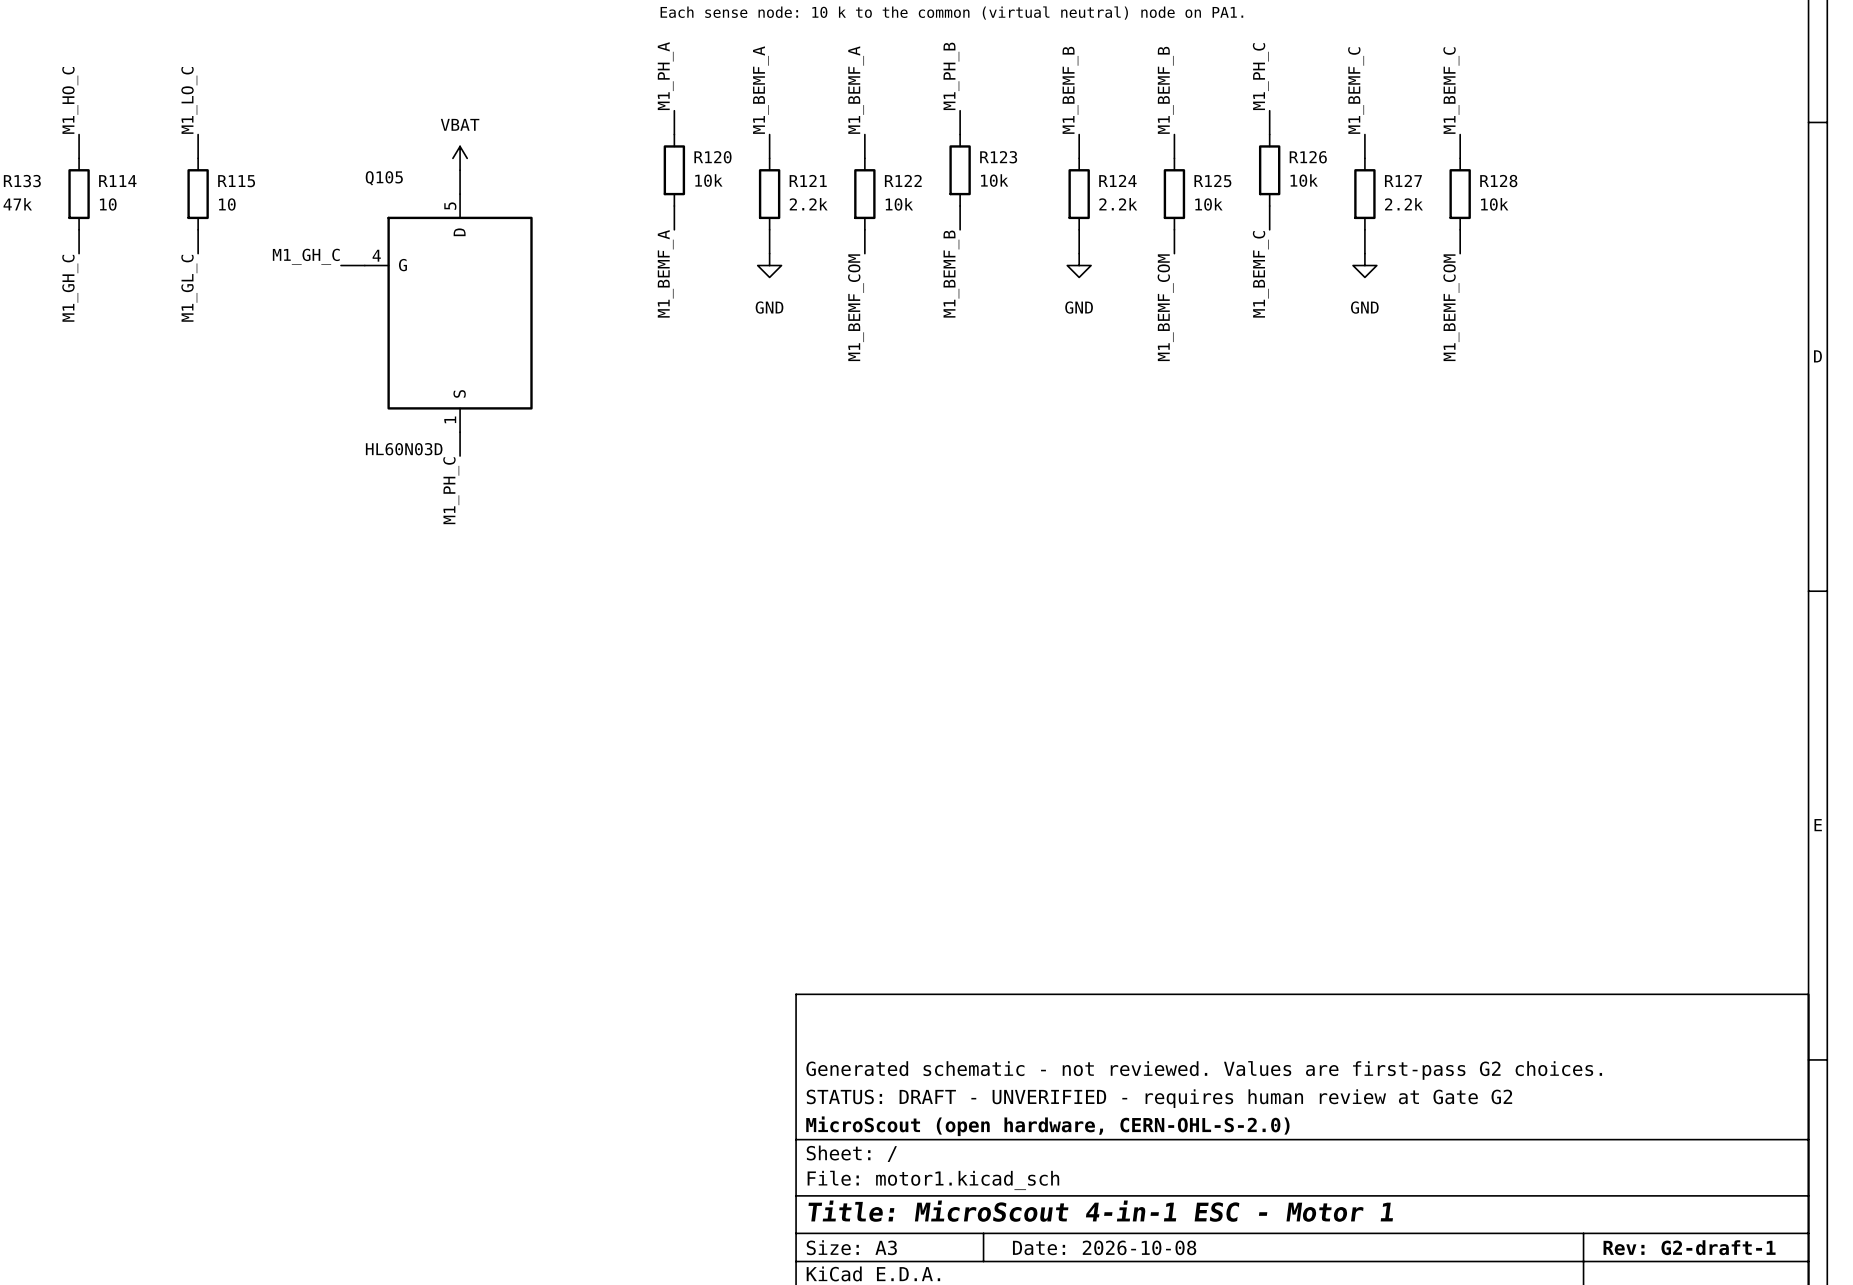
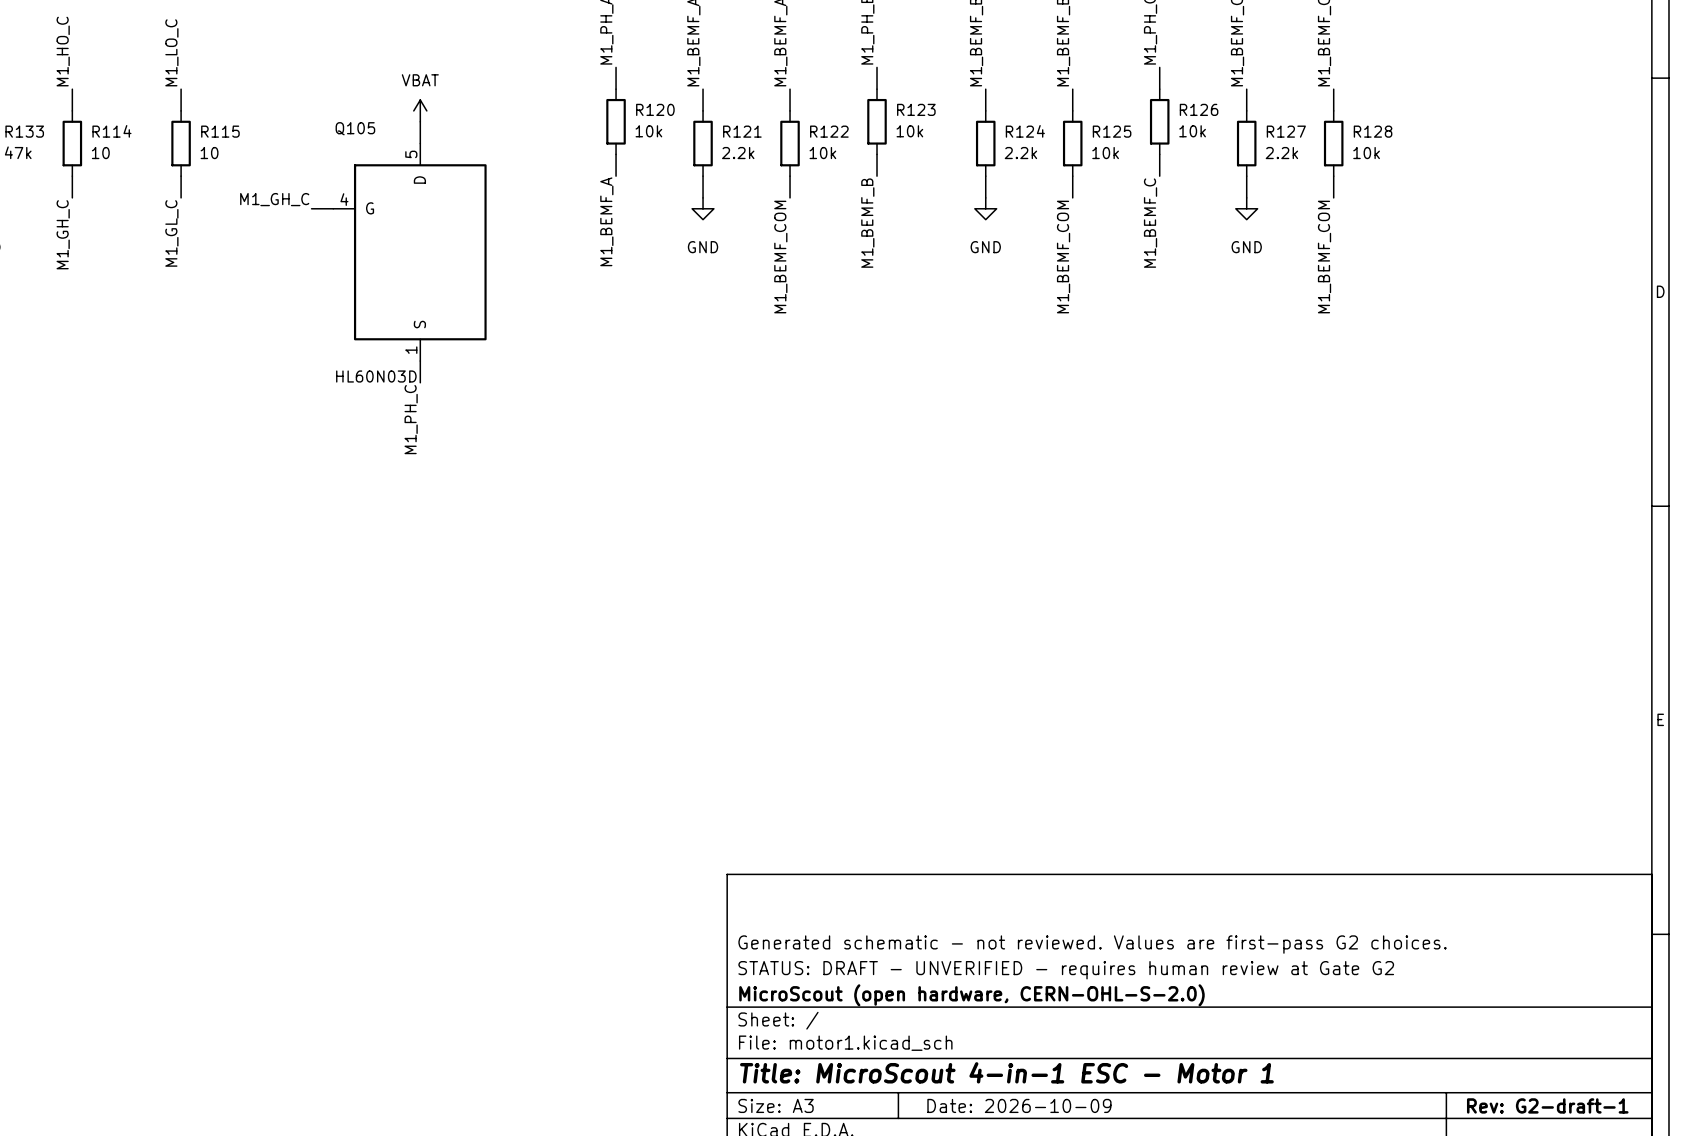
title block: Date: 2026-10-08 (1104, 1247) -> Date: 2026-10-09 (1019, 1105)

